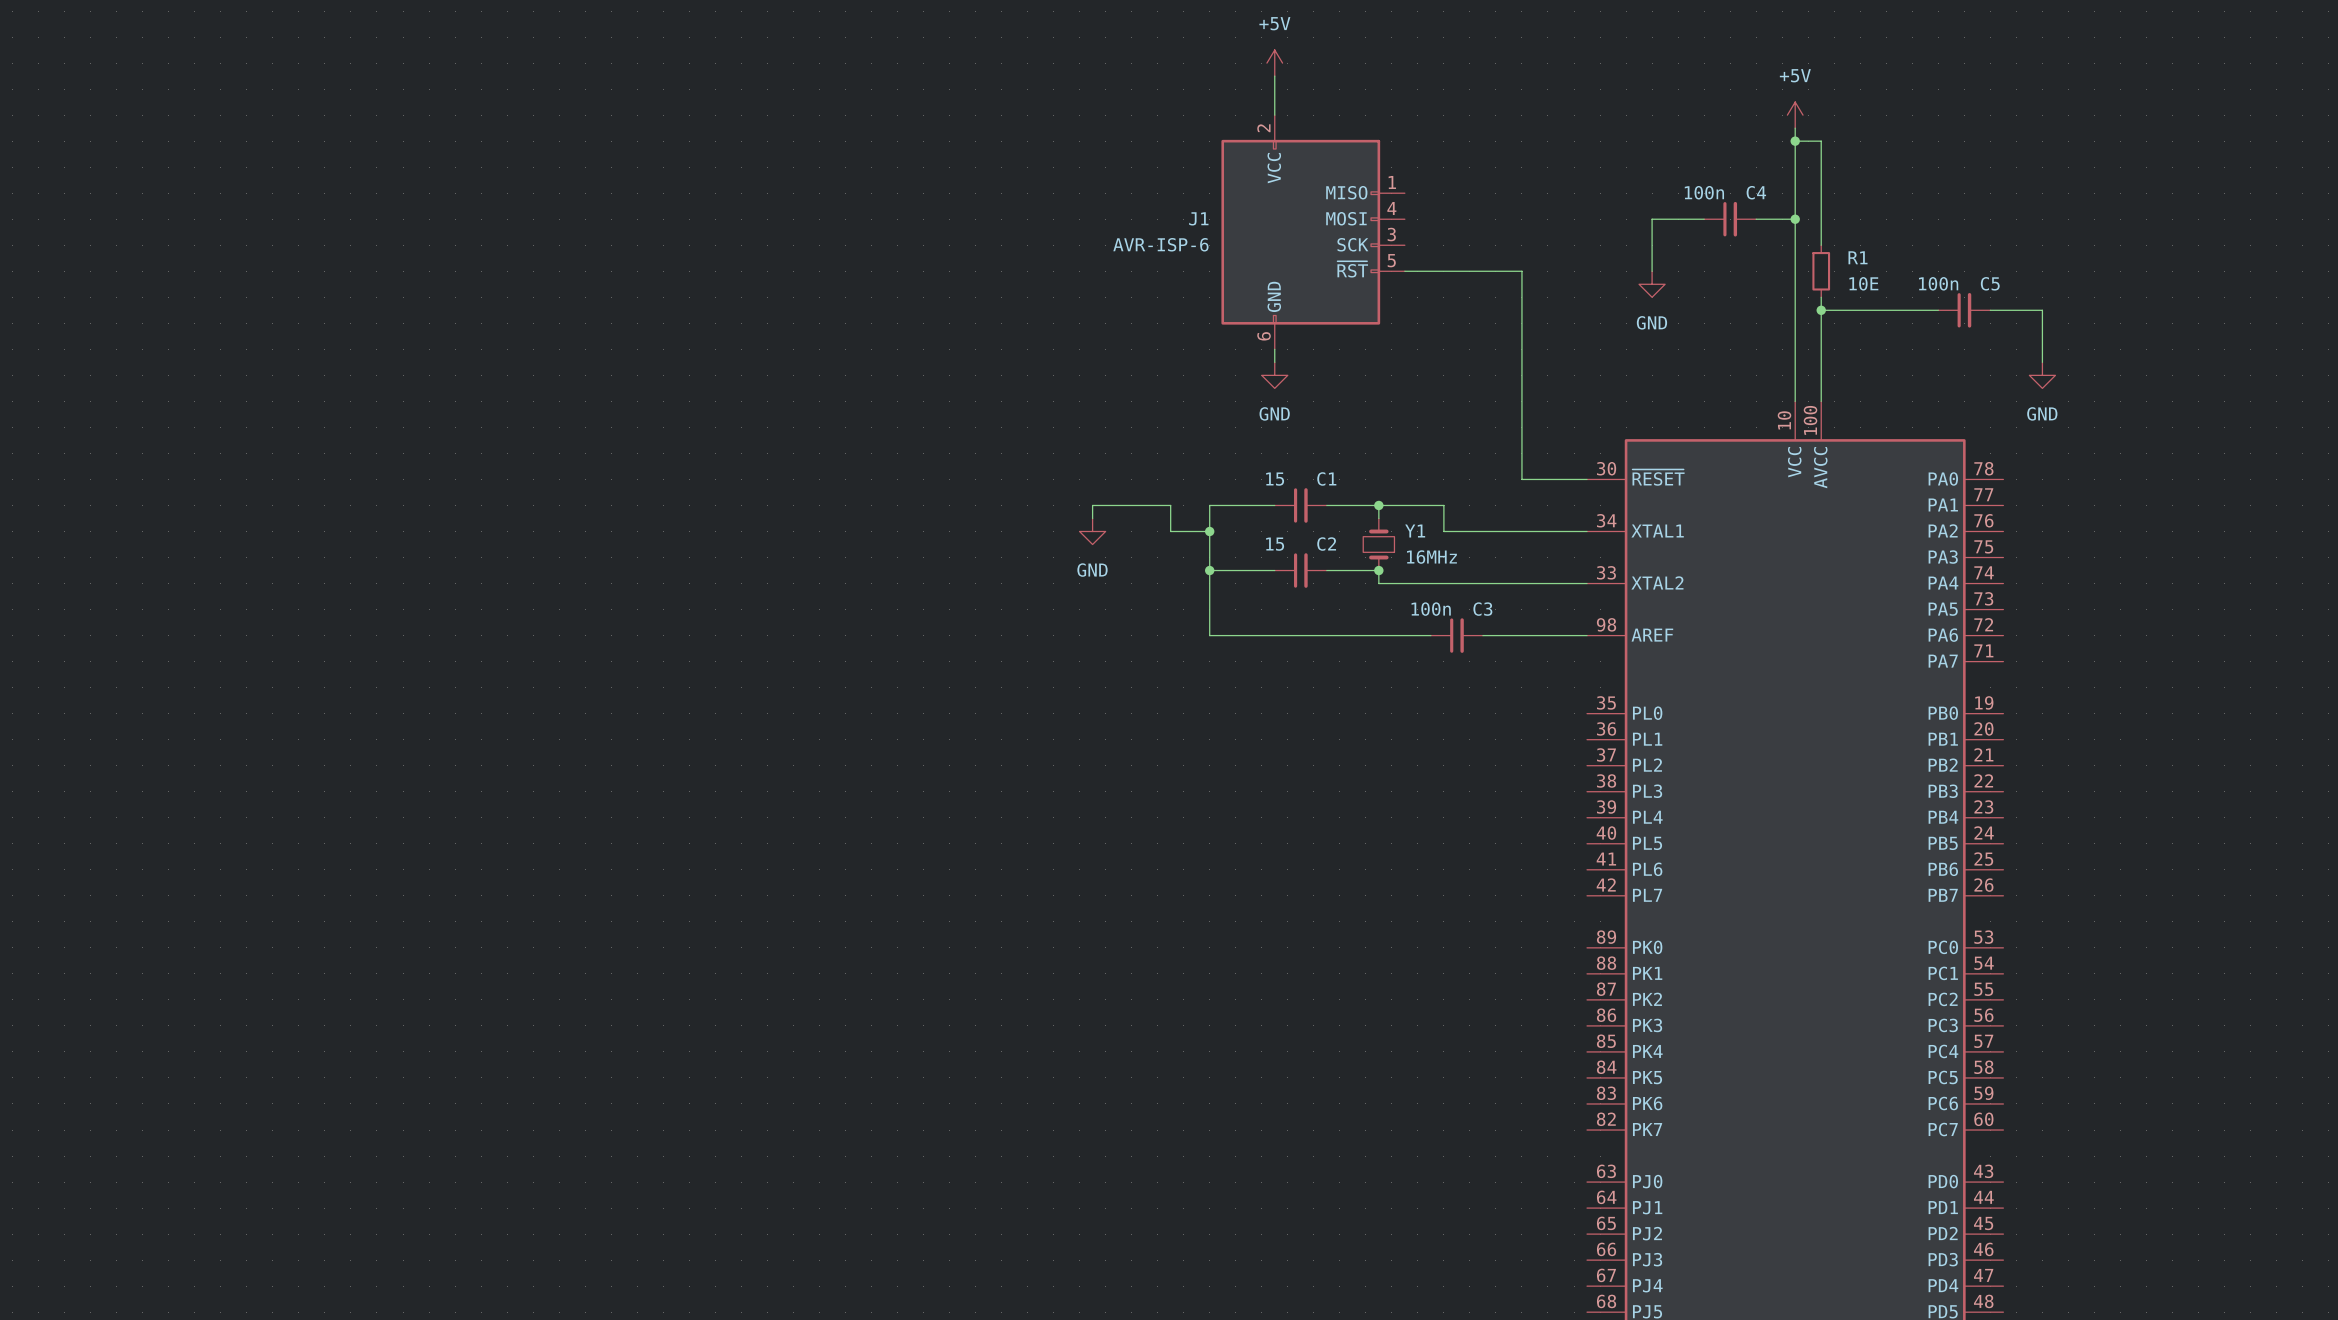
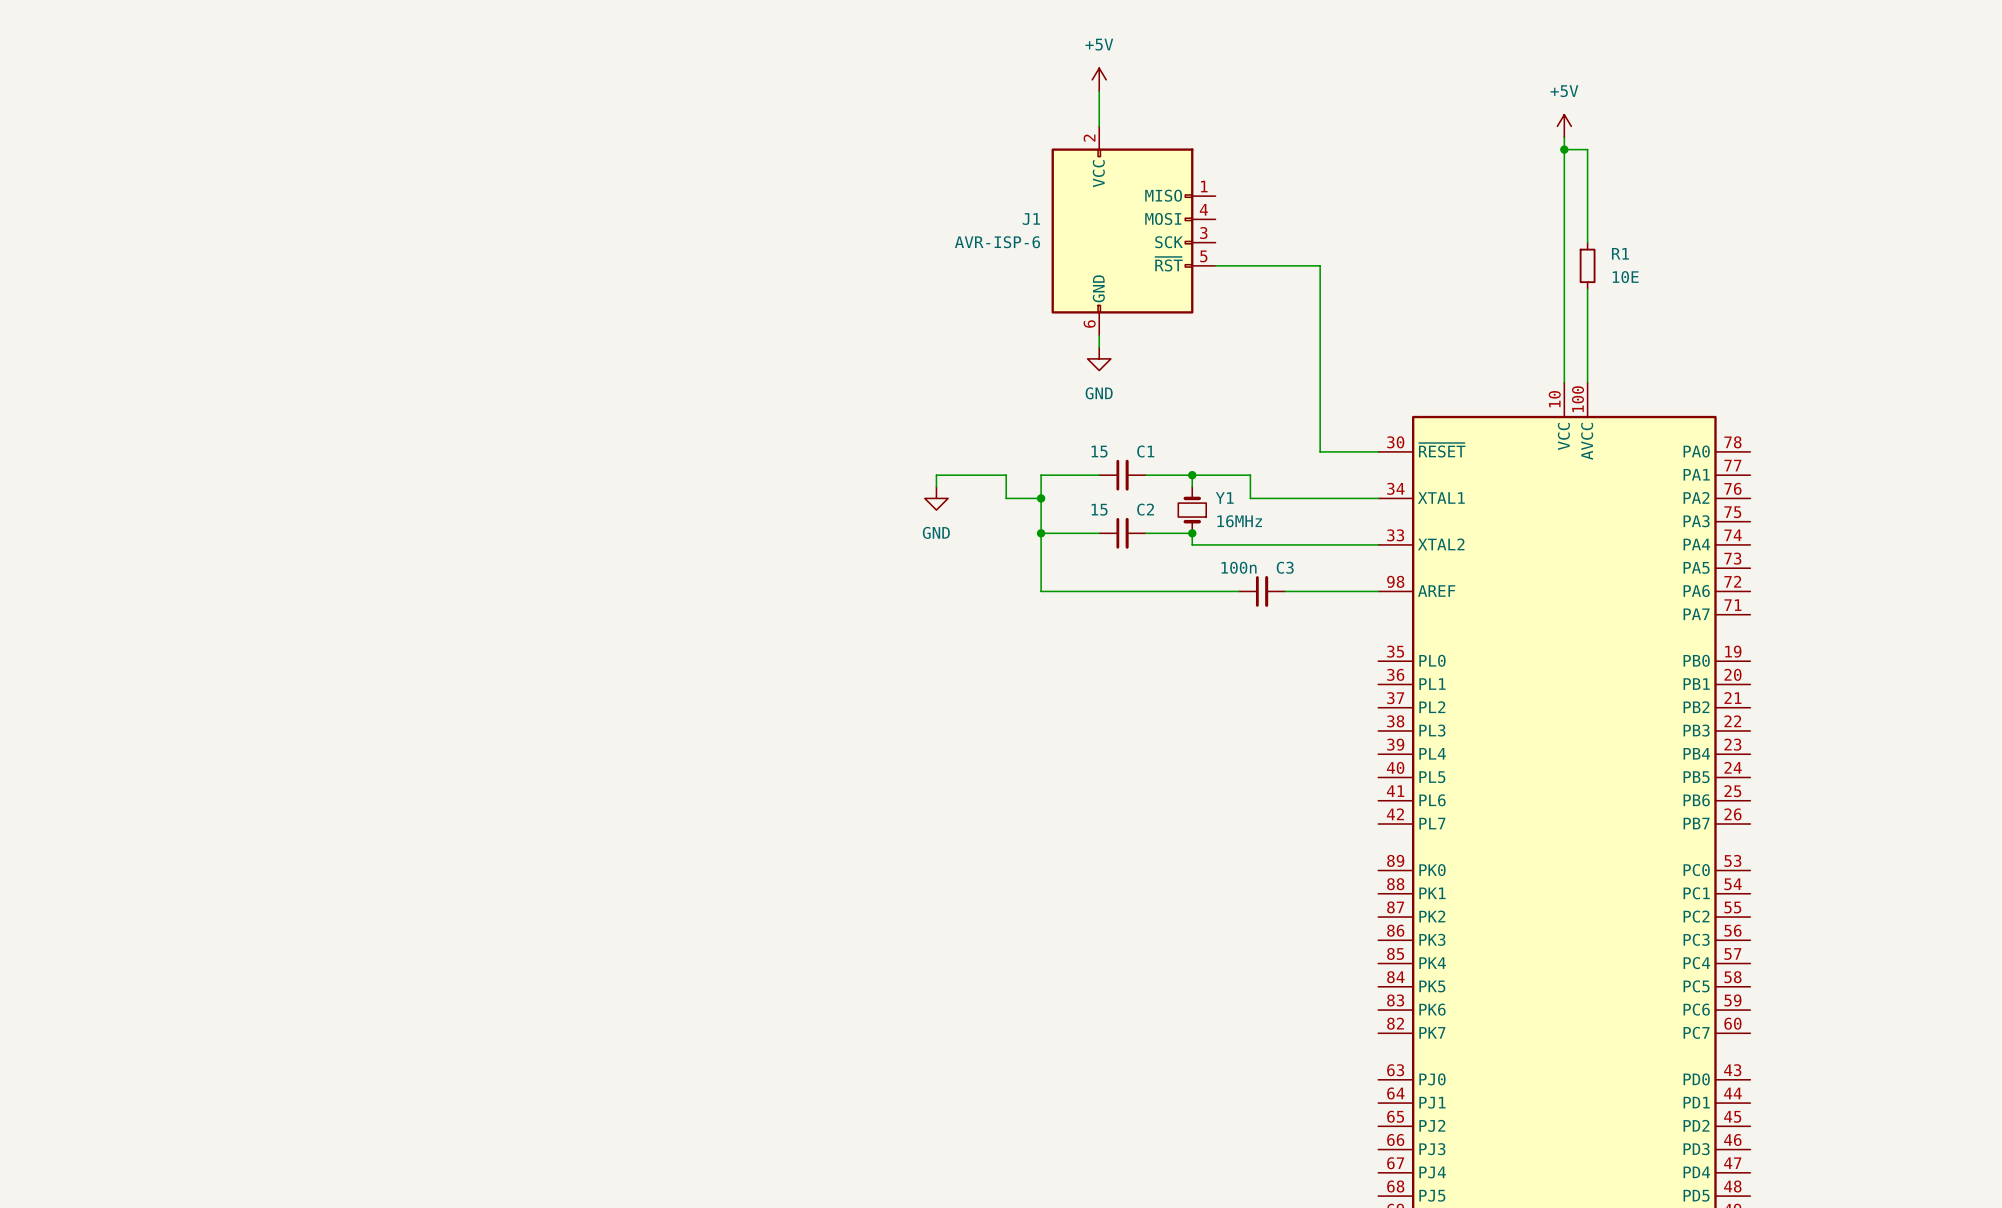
wire: (1704, 219) (1652, 219) (1652, 271) -> none
C4: 100n (1730, 219) -> none
wire: (1756, 219) (1795, 219) -> none
junction: (1795, 219) -> none
power symbol: GND (1652, 284) -> none
wire: (1821, 310) (1938, 310) -> none
junction: (1821, 310) -> none
C5: 100n (1964, 310) -> none
wire: (1990, 310) (2042, 310) (2042, 362) -> none
power symbol: GND (2042, 375) -> none

